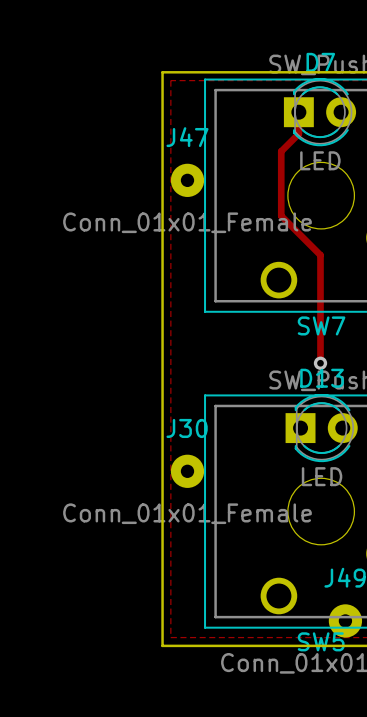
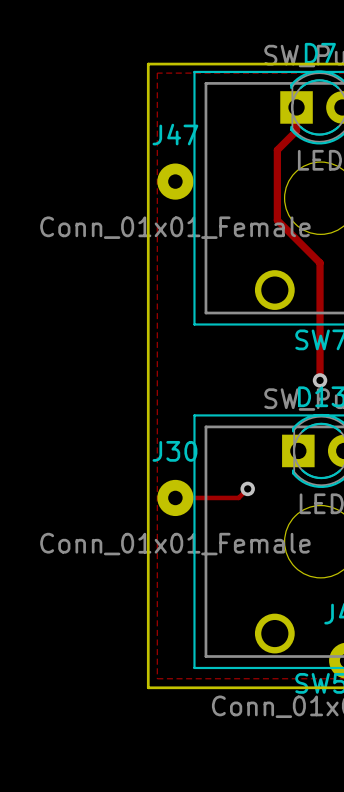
track: none -> (247, 488) (238, 497) (175, 497)
via: none -> (247, 488)

